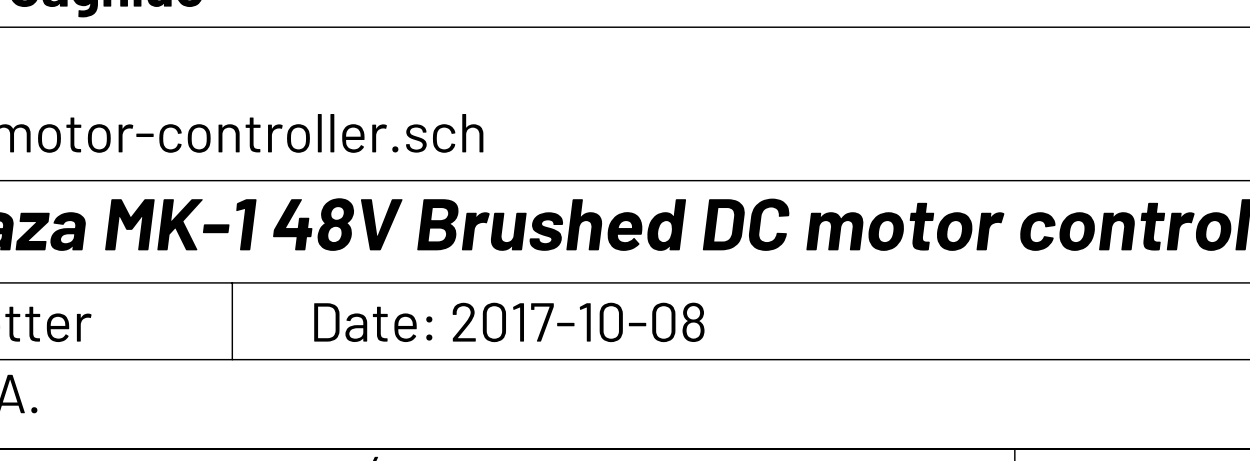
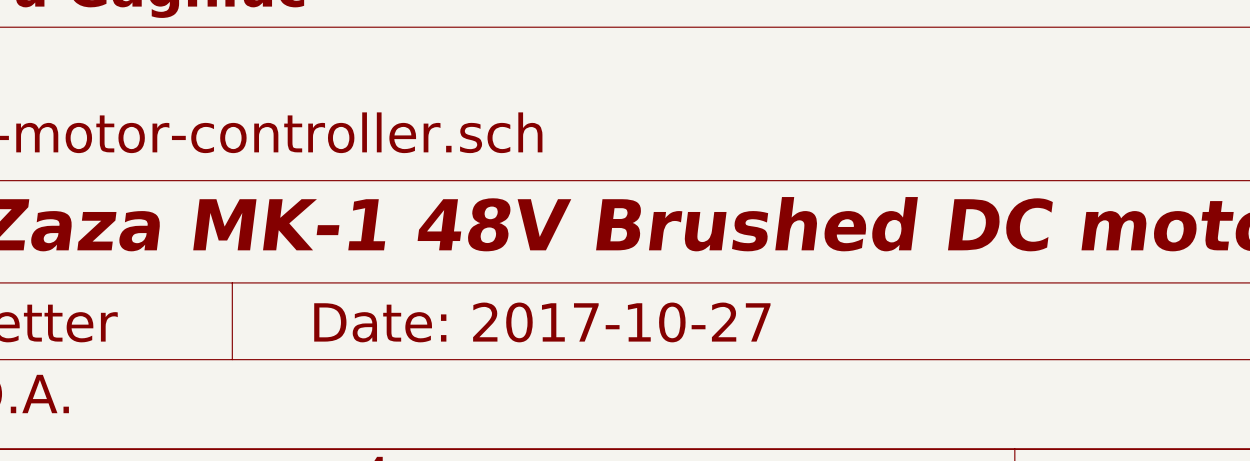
title block: Date: 2017-10-08 (509, 322) -> Date: 2017-10-27 (542, 322)

